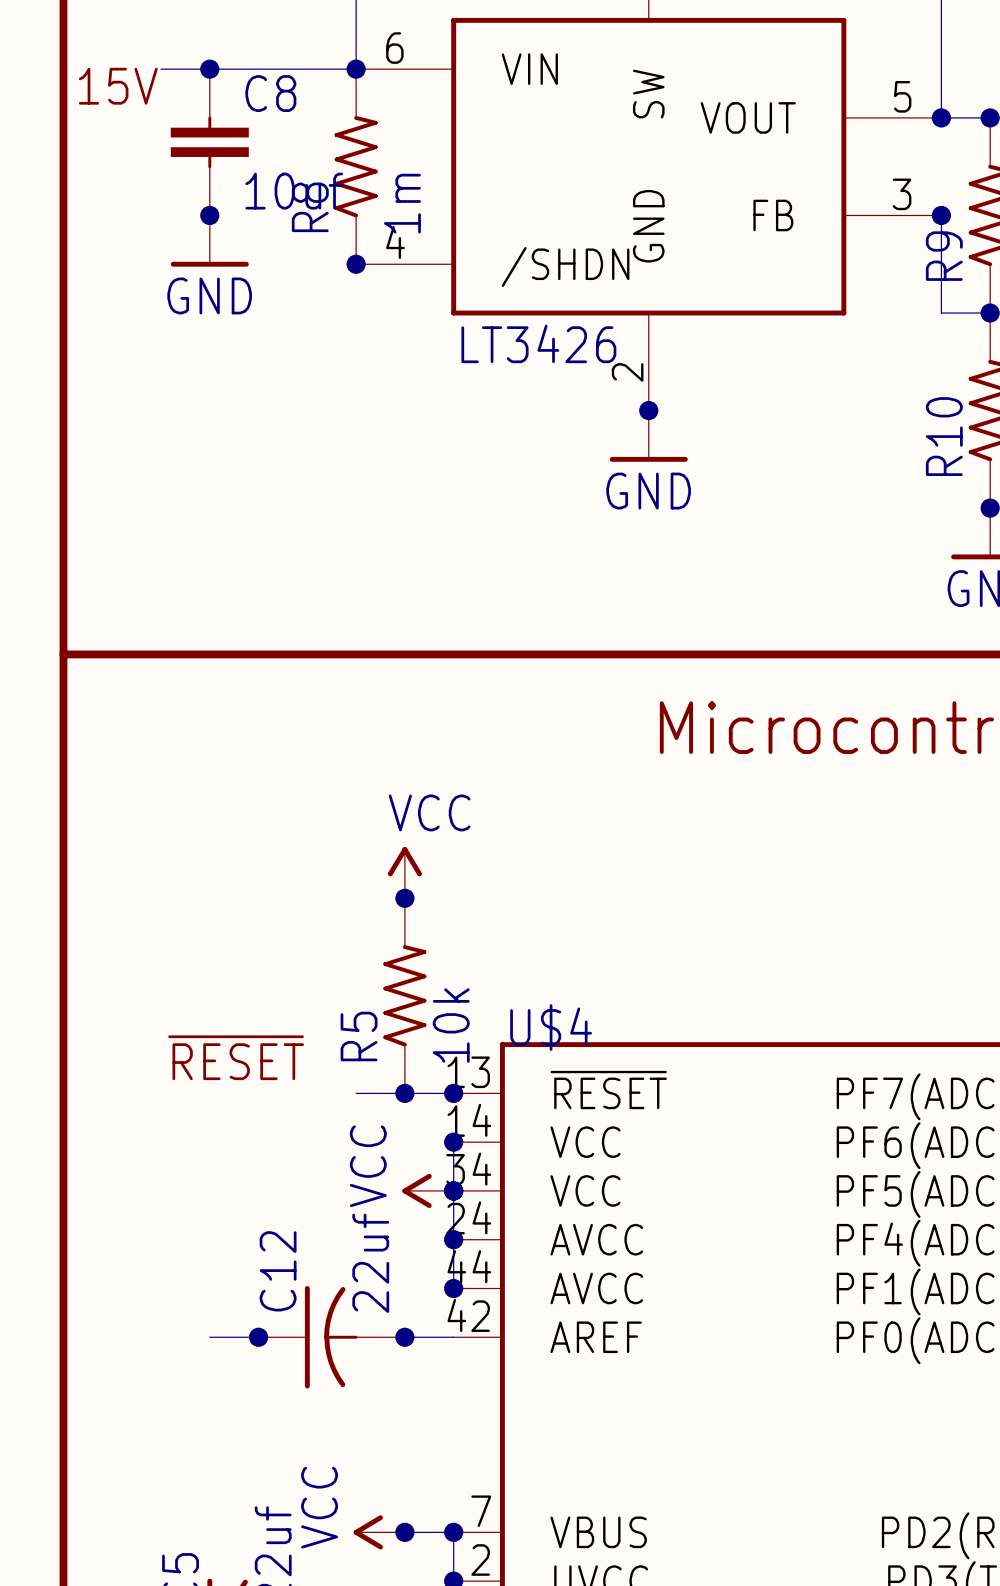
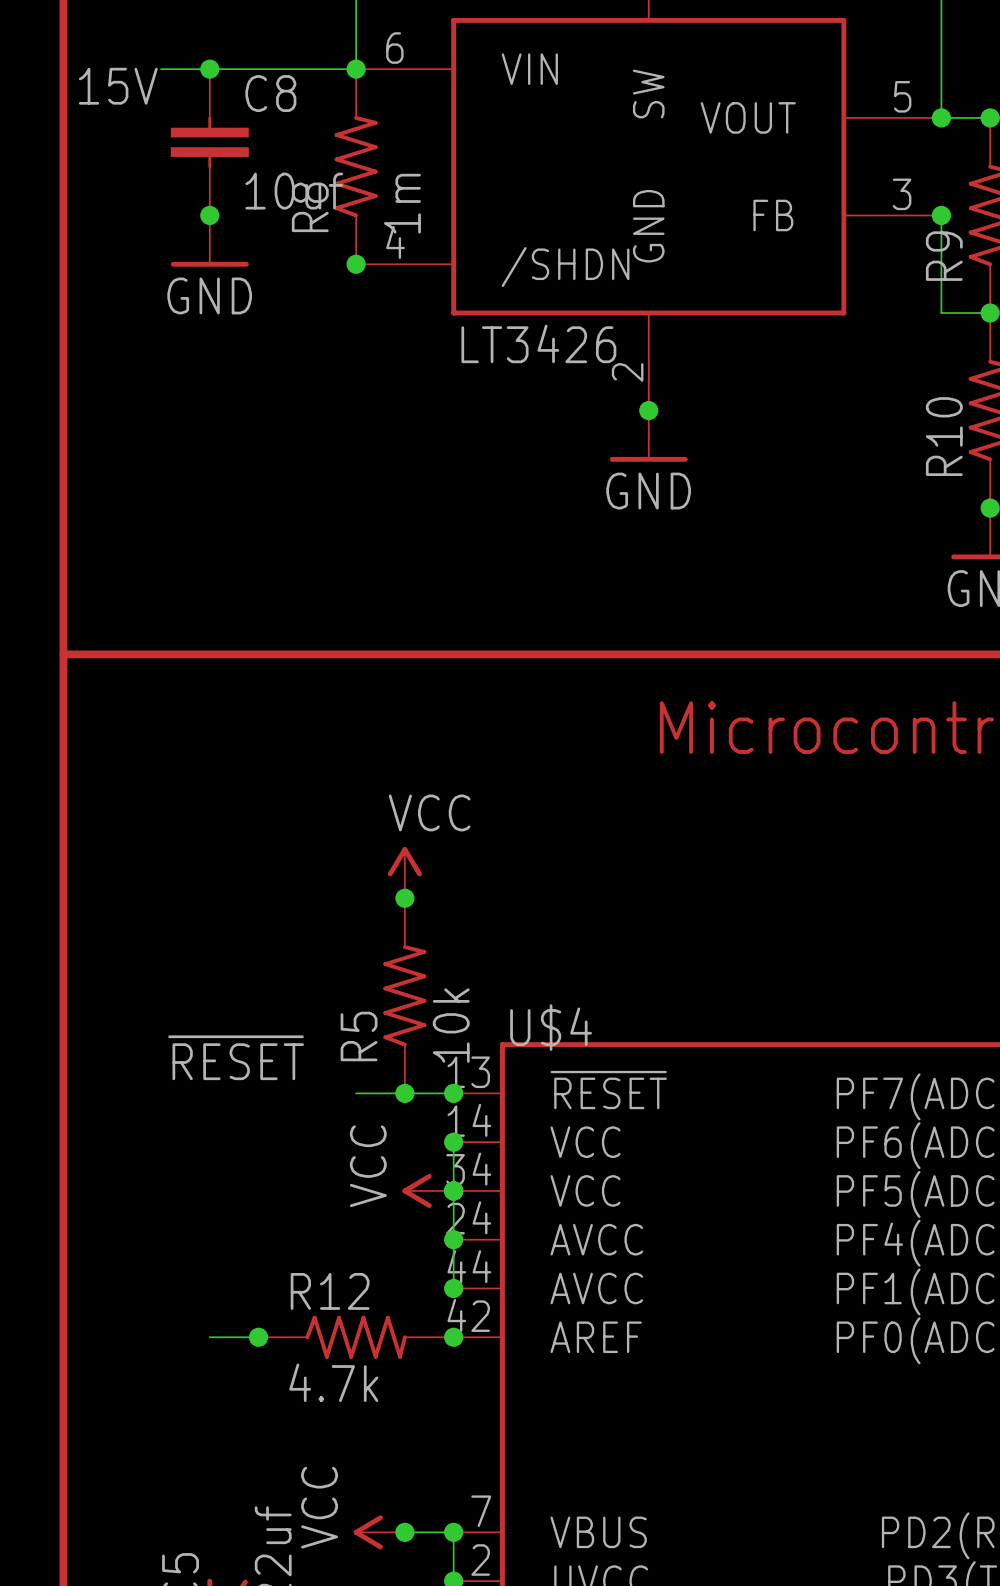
C12: 22uf (331, 1337) -> none
R12: none -> 4.7k (356, 1337)
junction position: (404, 1337) -> (453, 1337)

